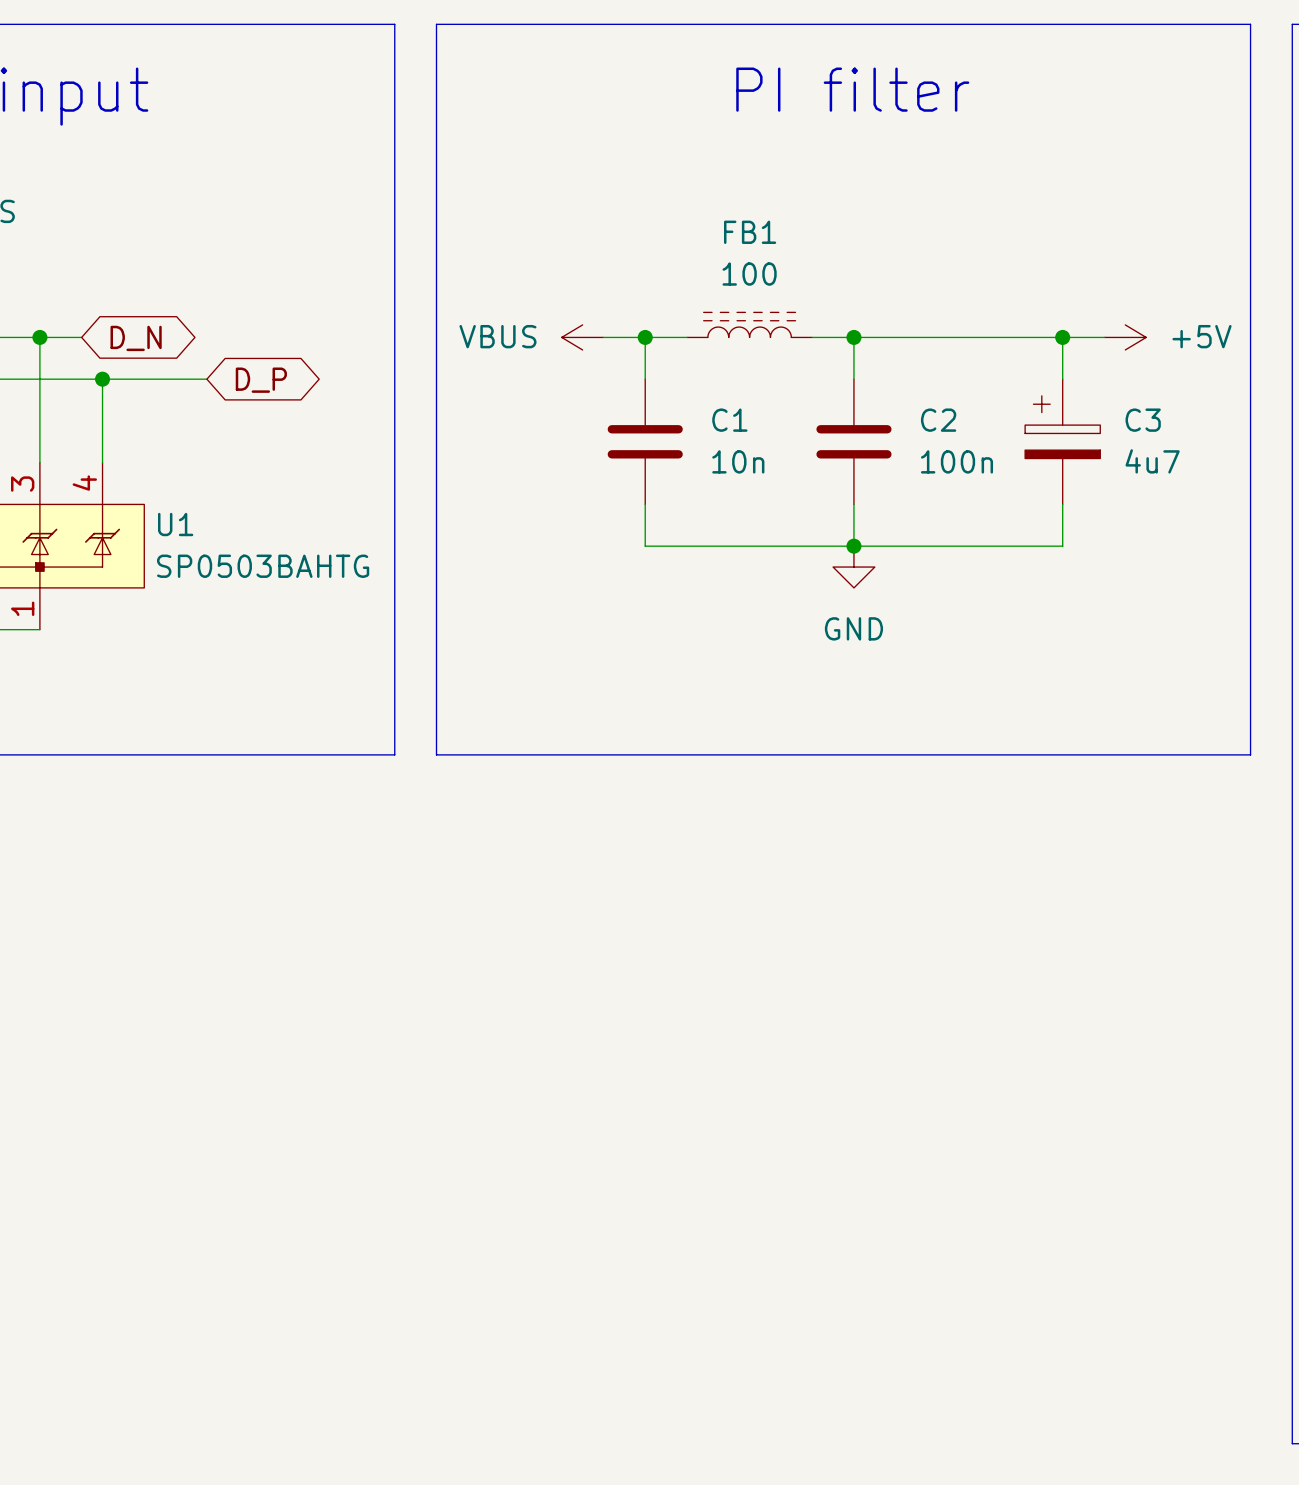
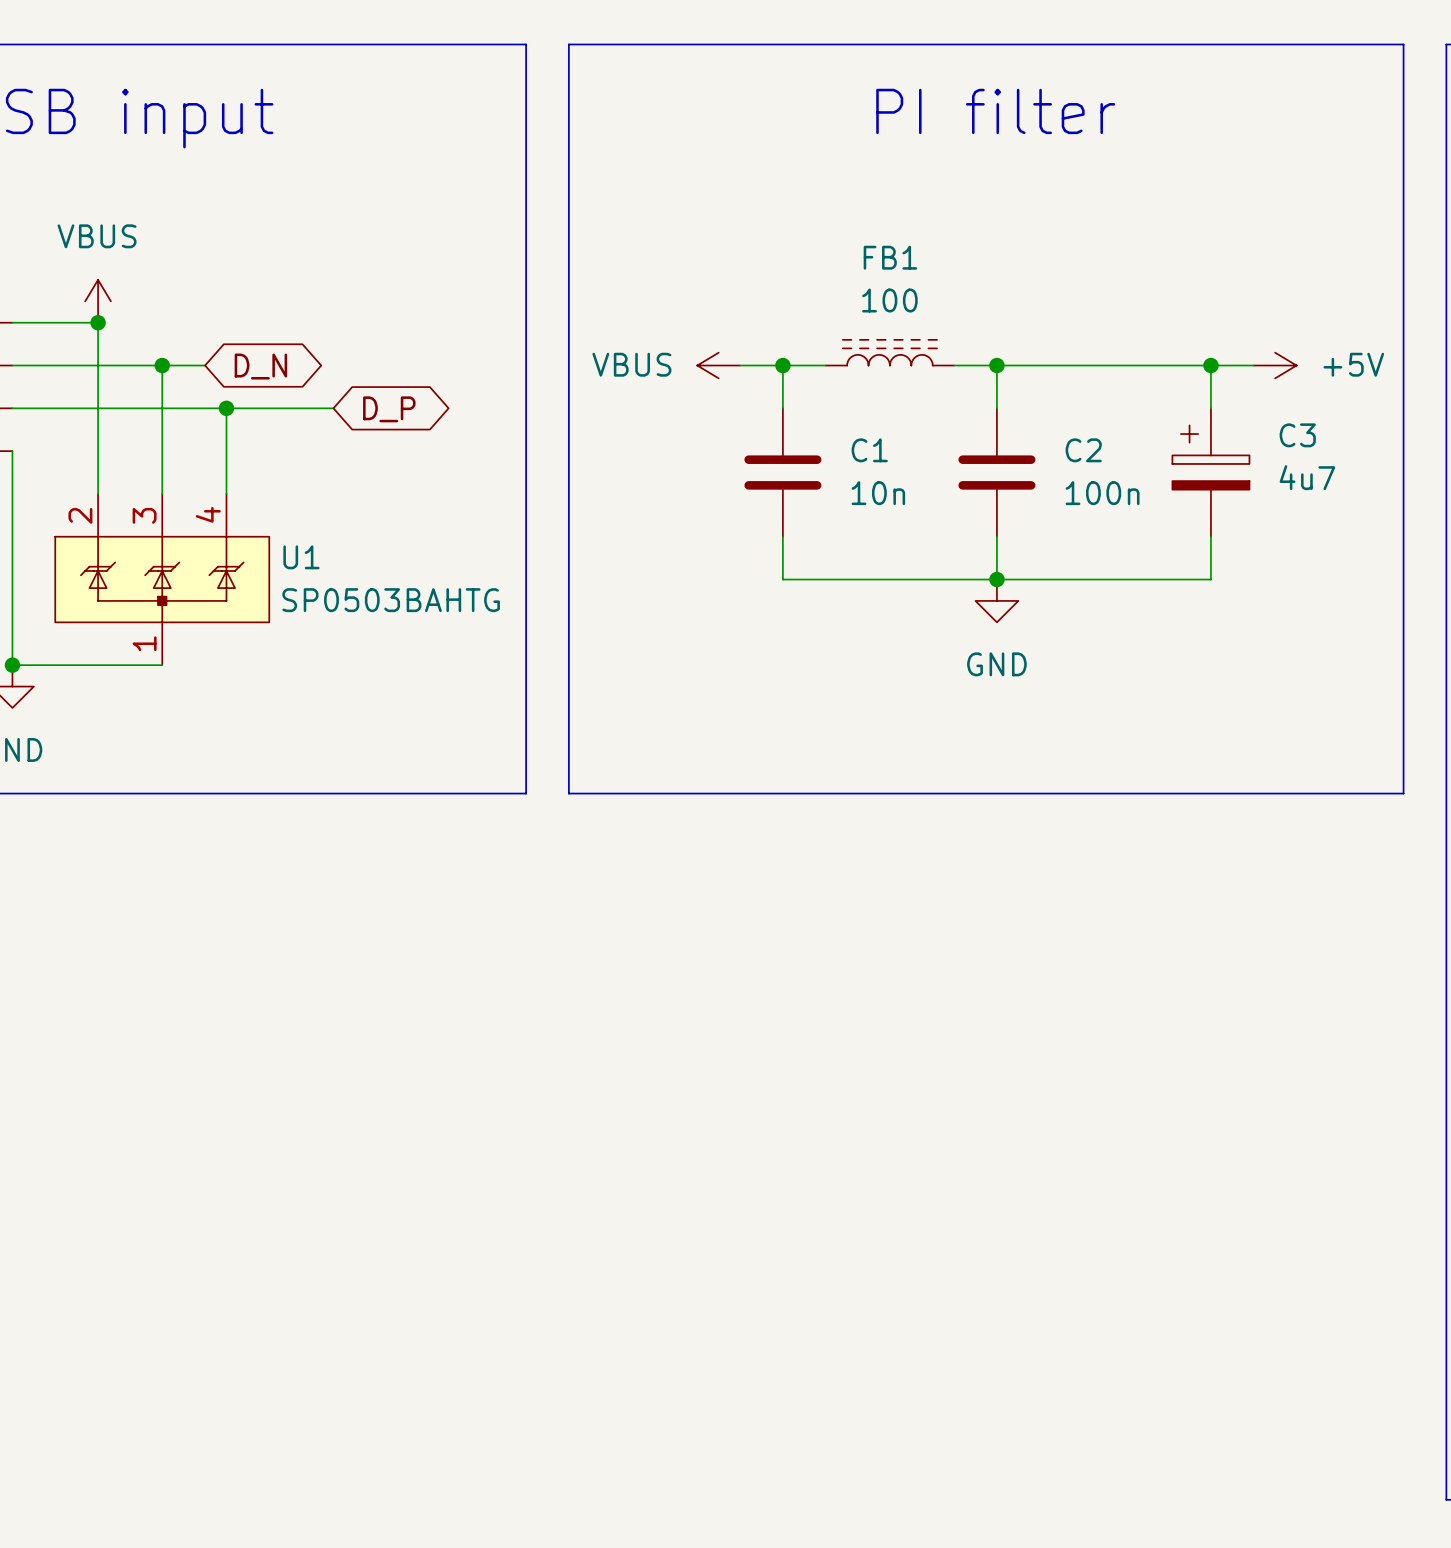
C3 name position: C3 (1143, 420) -> C3 (1297, 435)
C3 value position: 4u7 (1152, 461) -> 4u7 (1307, 477)

